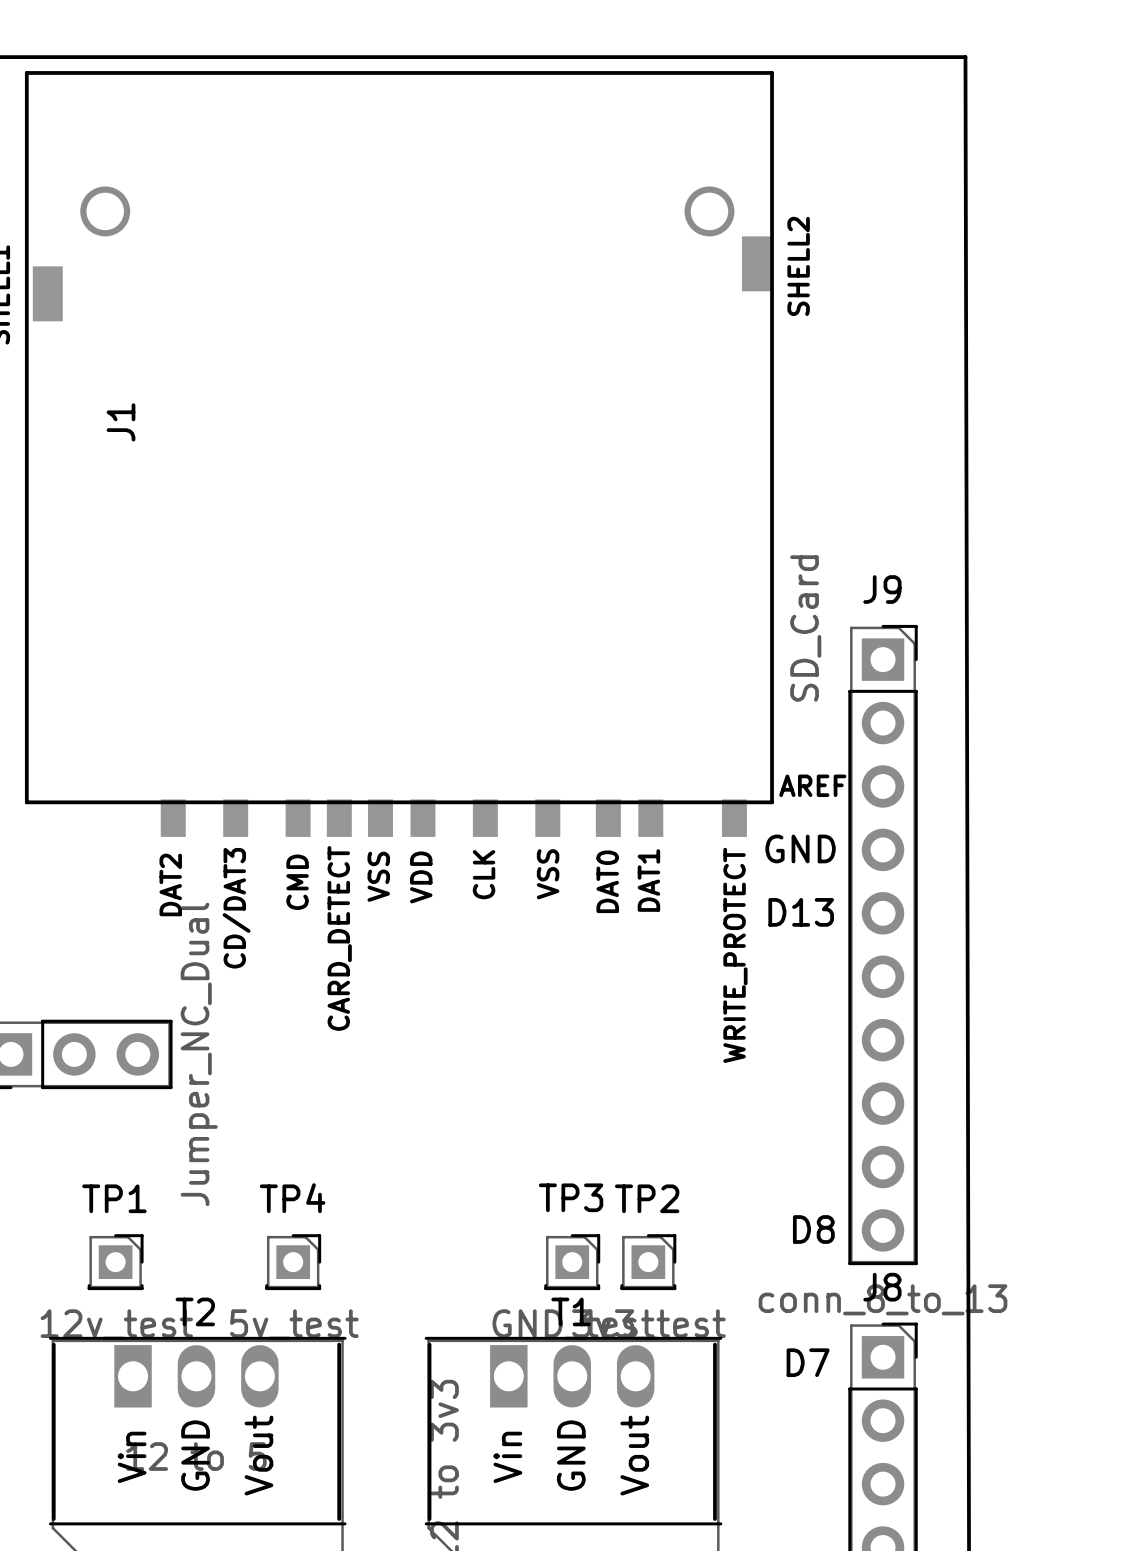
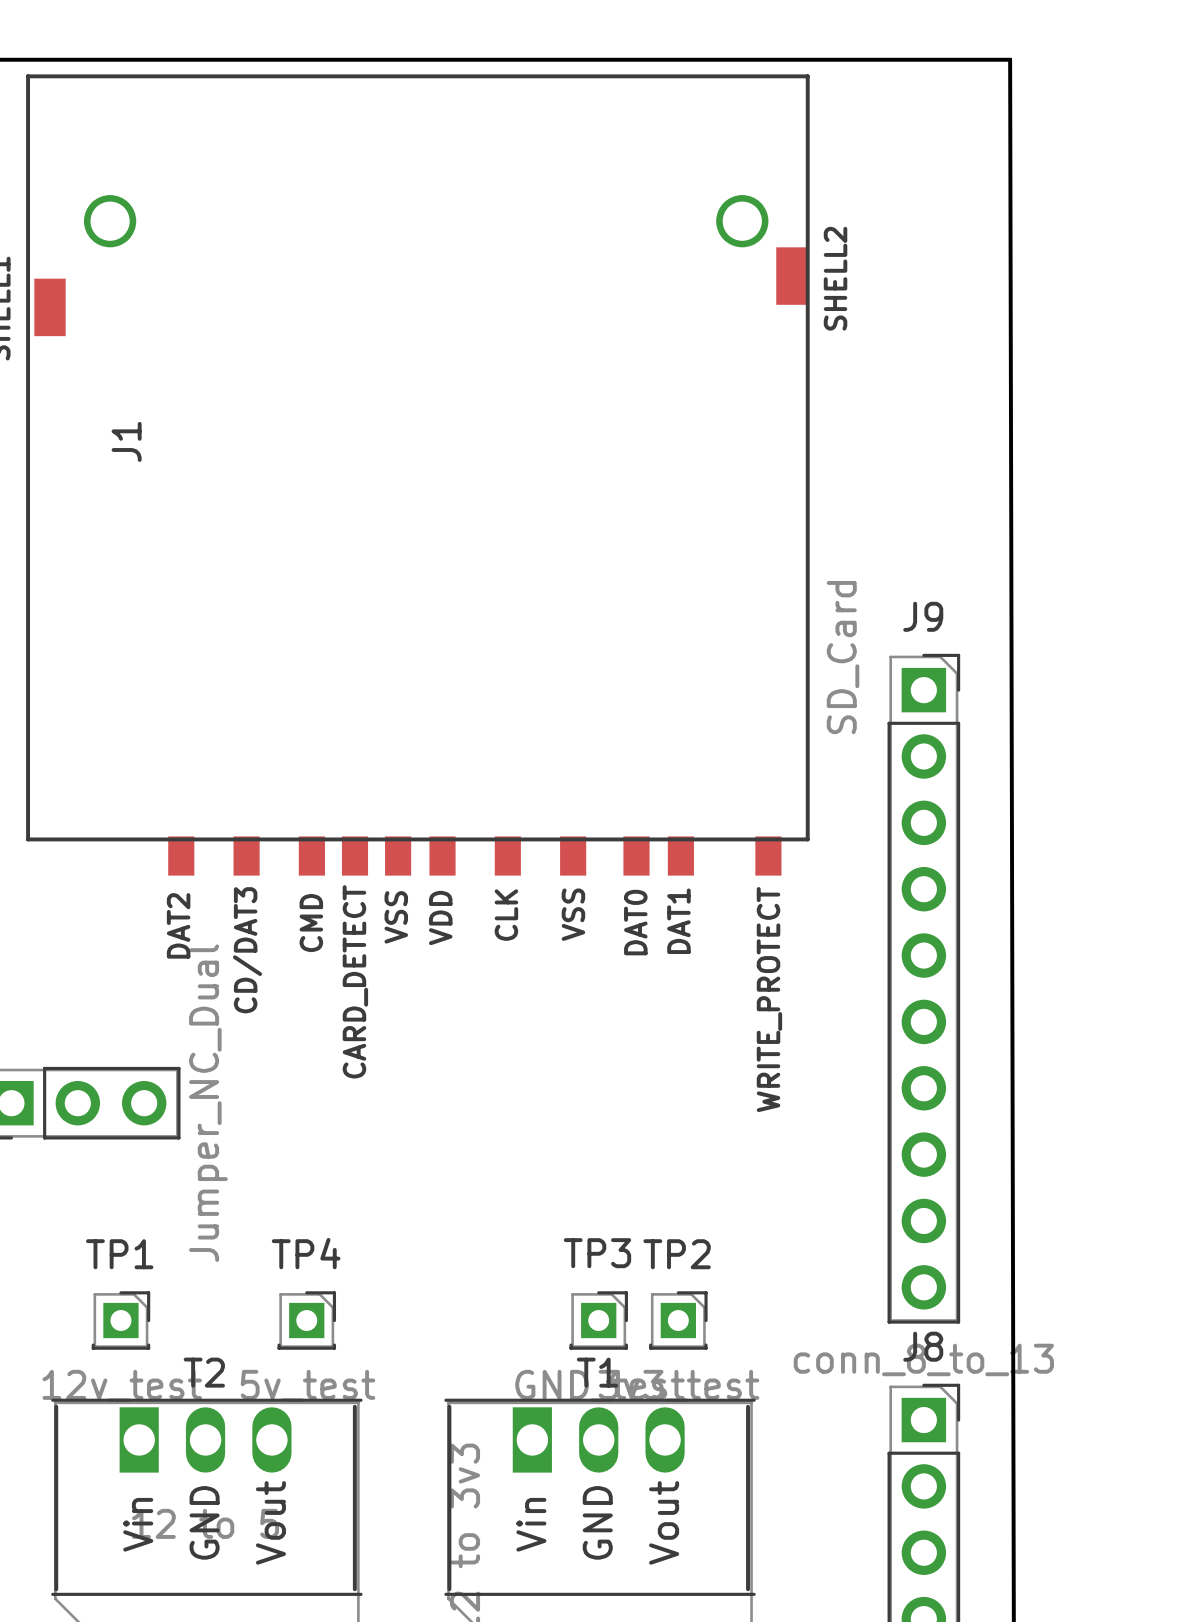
J9 text: AREF (812, 785) -> none
J9 text: GND (800, 848) -> none
J9 text: D13 (801, 912) -> none
J9 text: D8 (813, 1229) -> none
J8 text: D7 (808, 1362) -> none

